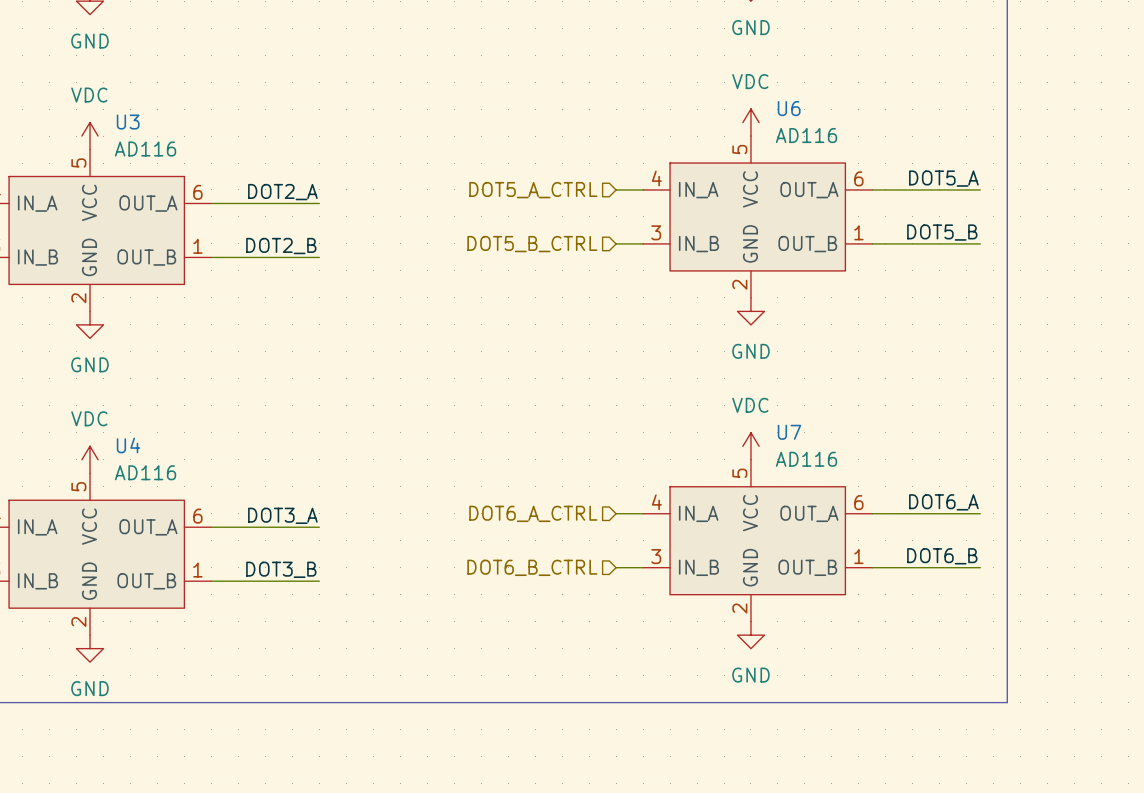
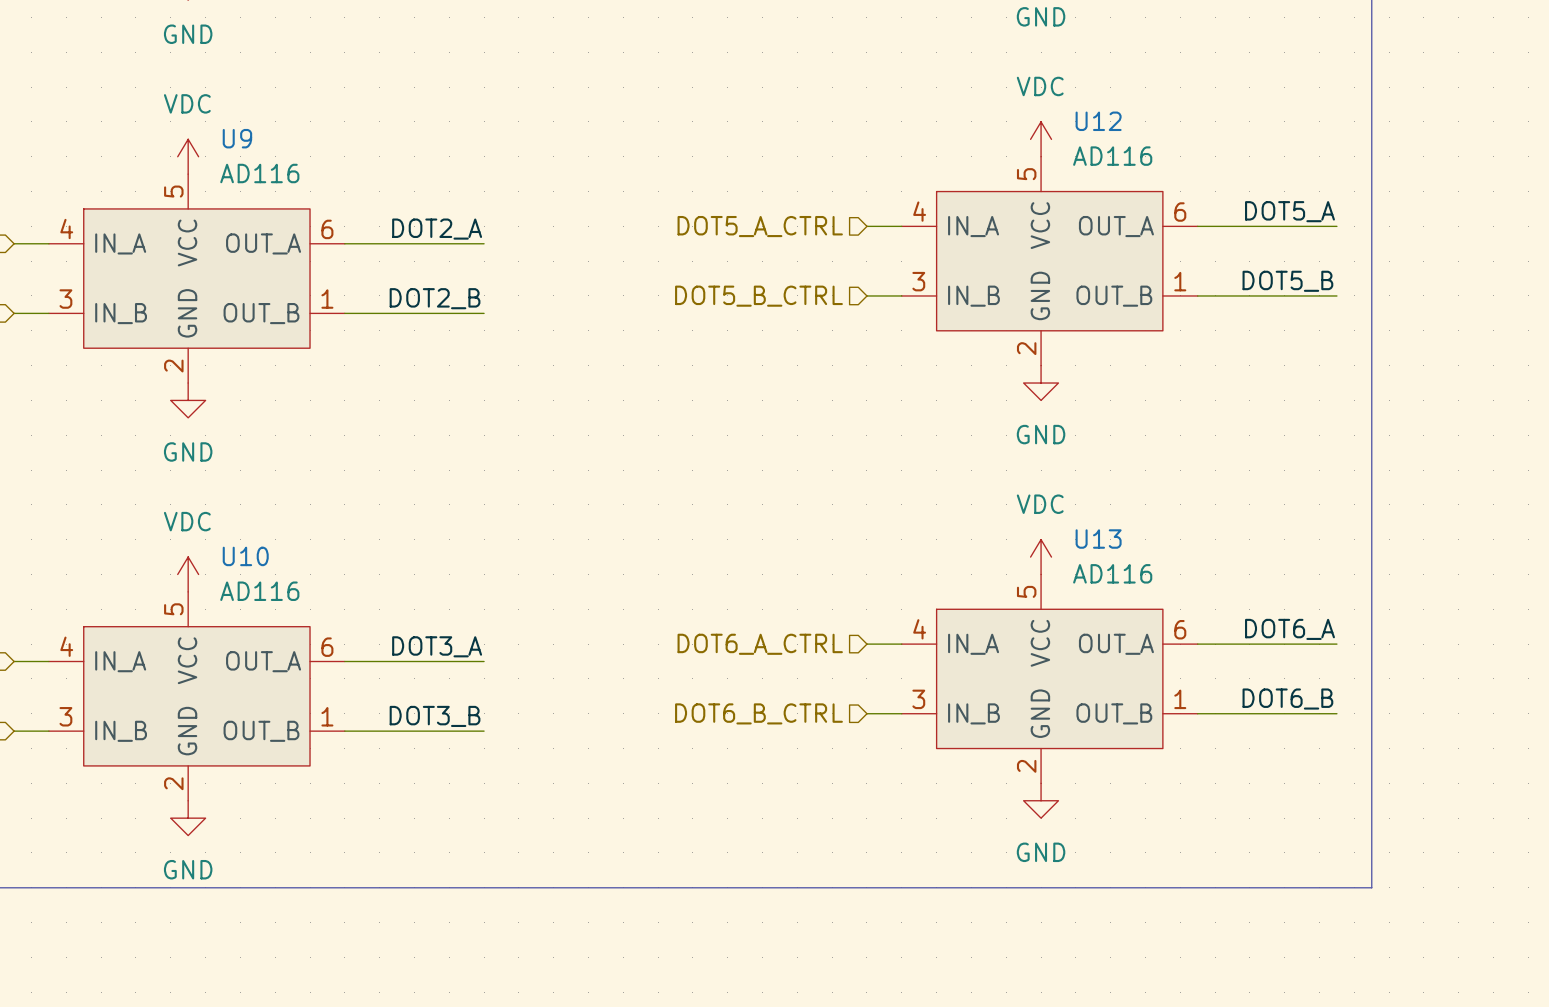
U6 name: U6 (789, 108) -> U12 (1098, 121)
U3 name: U3 (128, 122) -> U9 (237, 138)
U7 name: U7 (789, 432) -> U13 (1098, 539)
U4 name: U4 (128, 445) -> U10 (245, 556)

